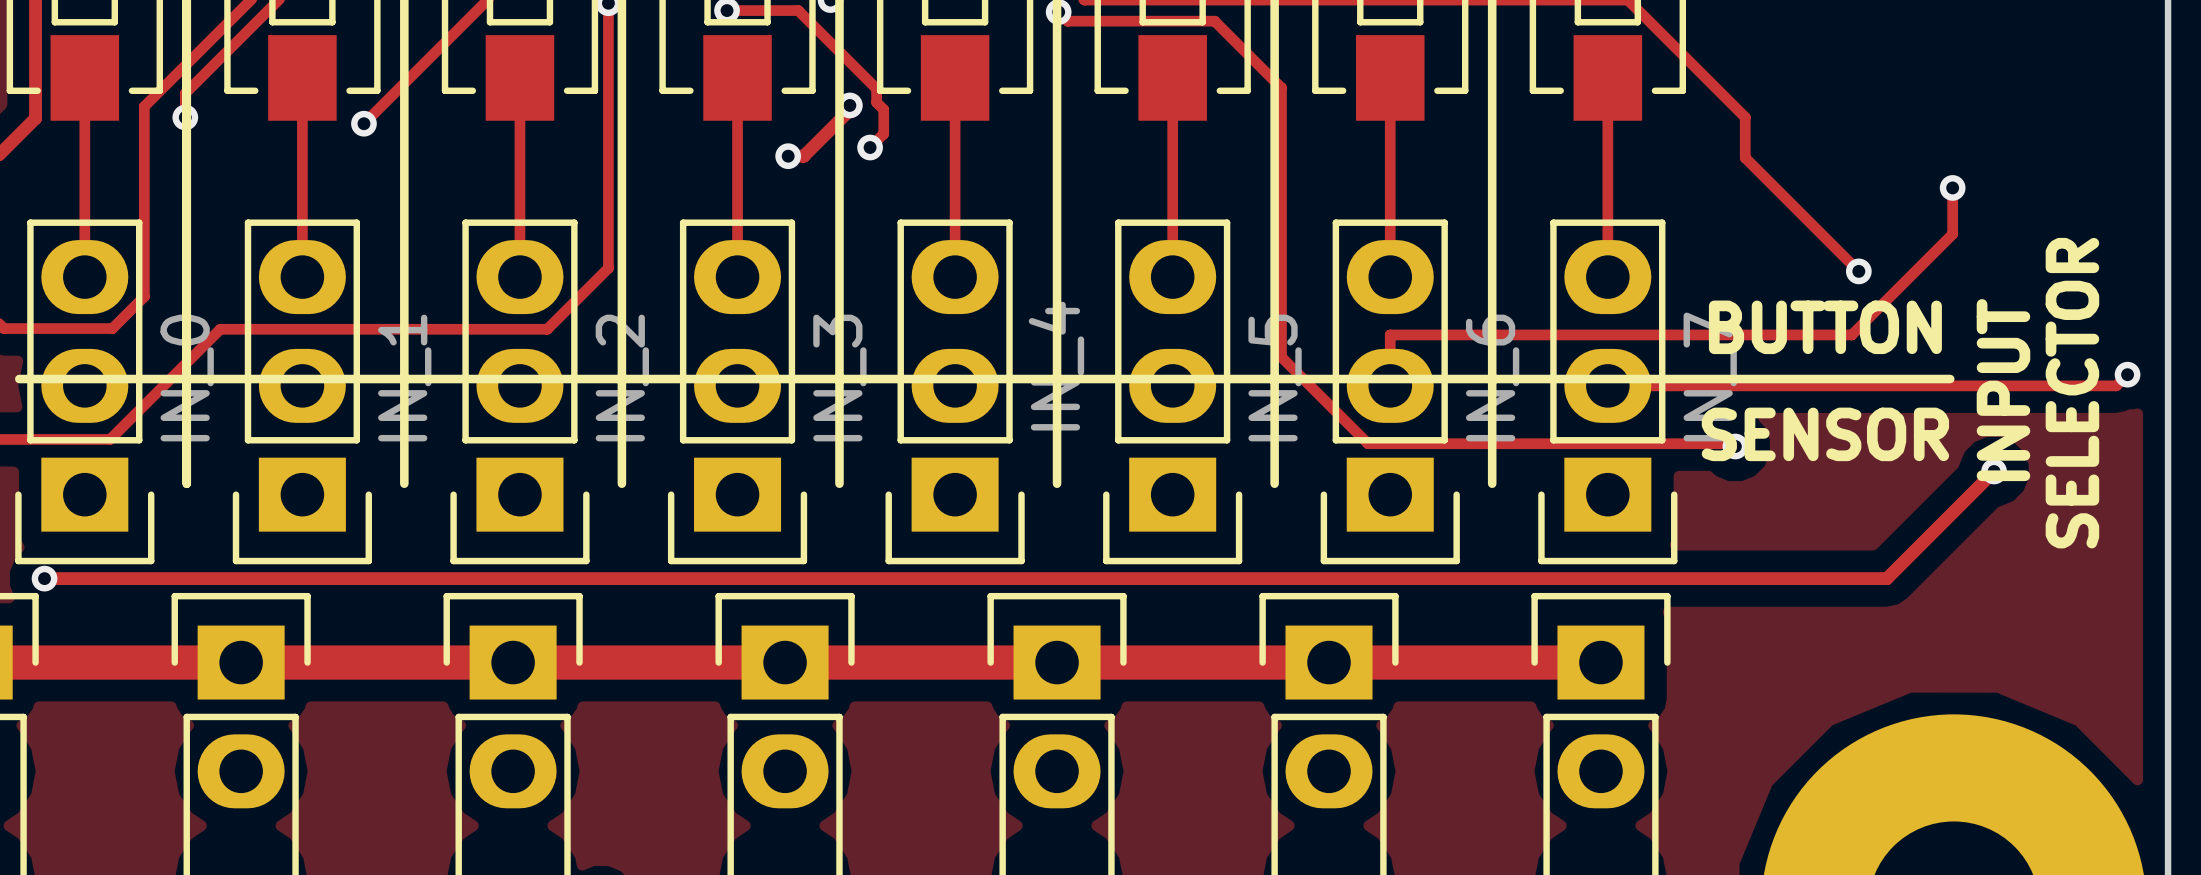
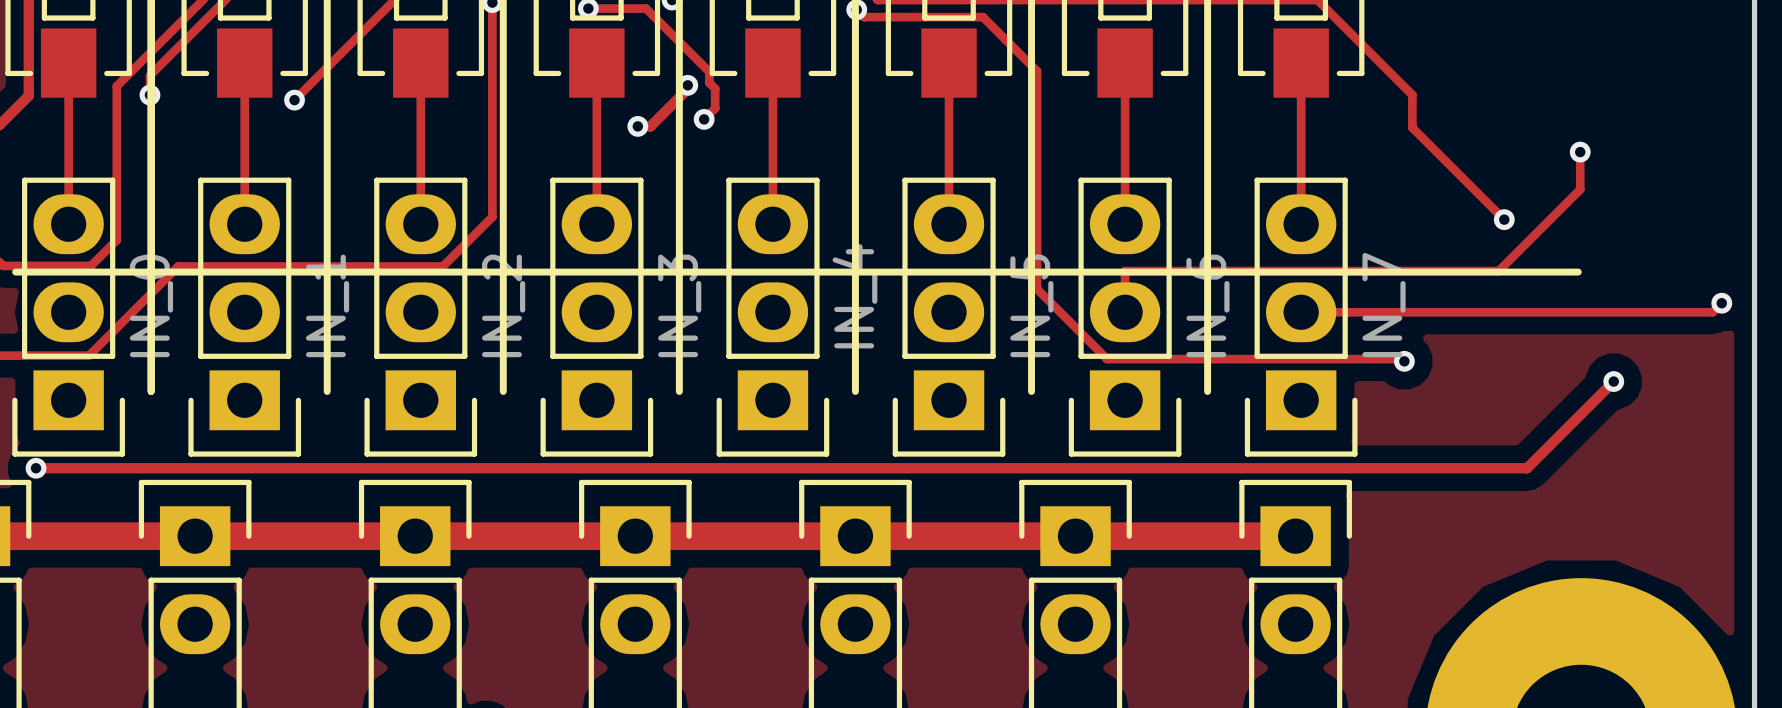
text: BUTTON (1825, 327) -> none
line: (19, 379) (1950, 379) -> (15, 272) (1578, 272)
text: INPUT (2003, 390) -> none
text: SELECTOR (2072, 393) -> none
text: SENSOR (1825, 434) -> none

